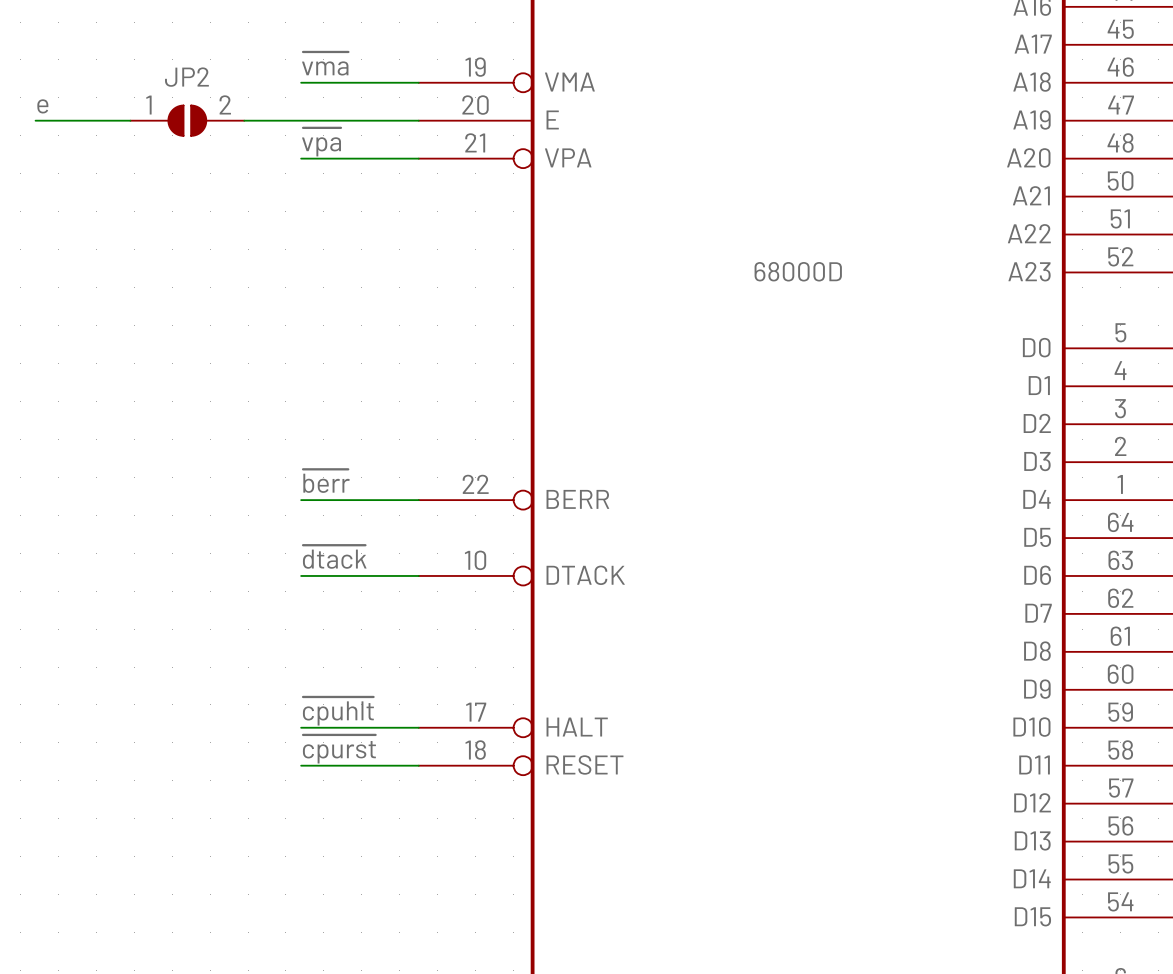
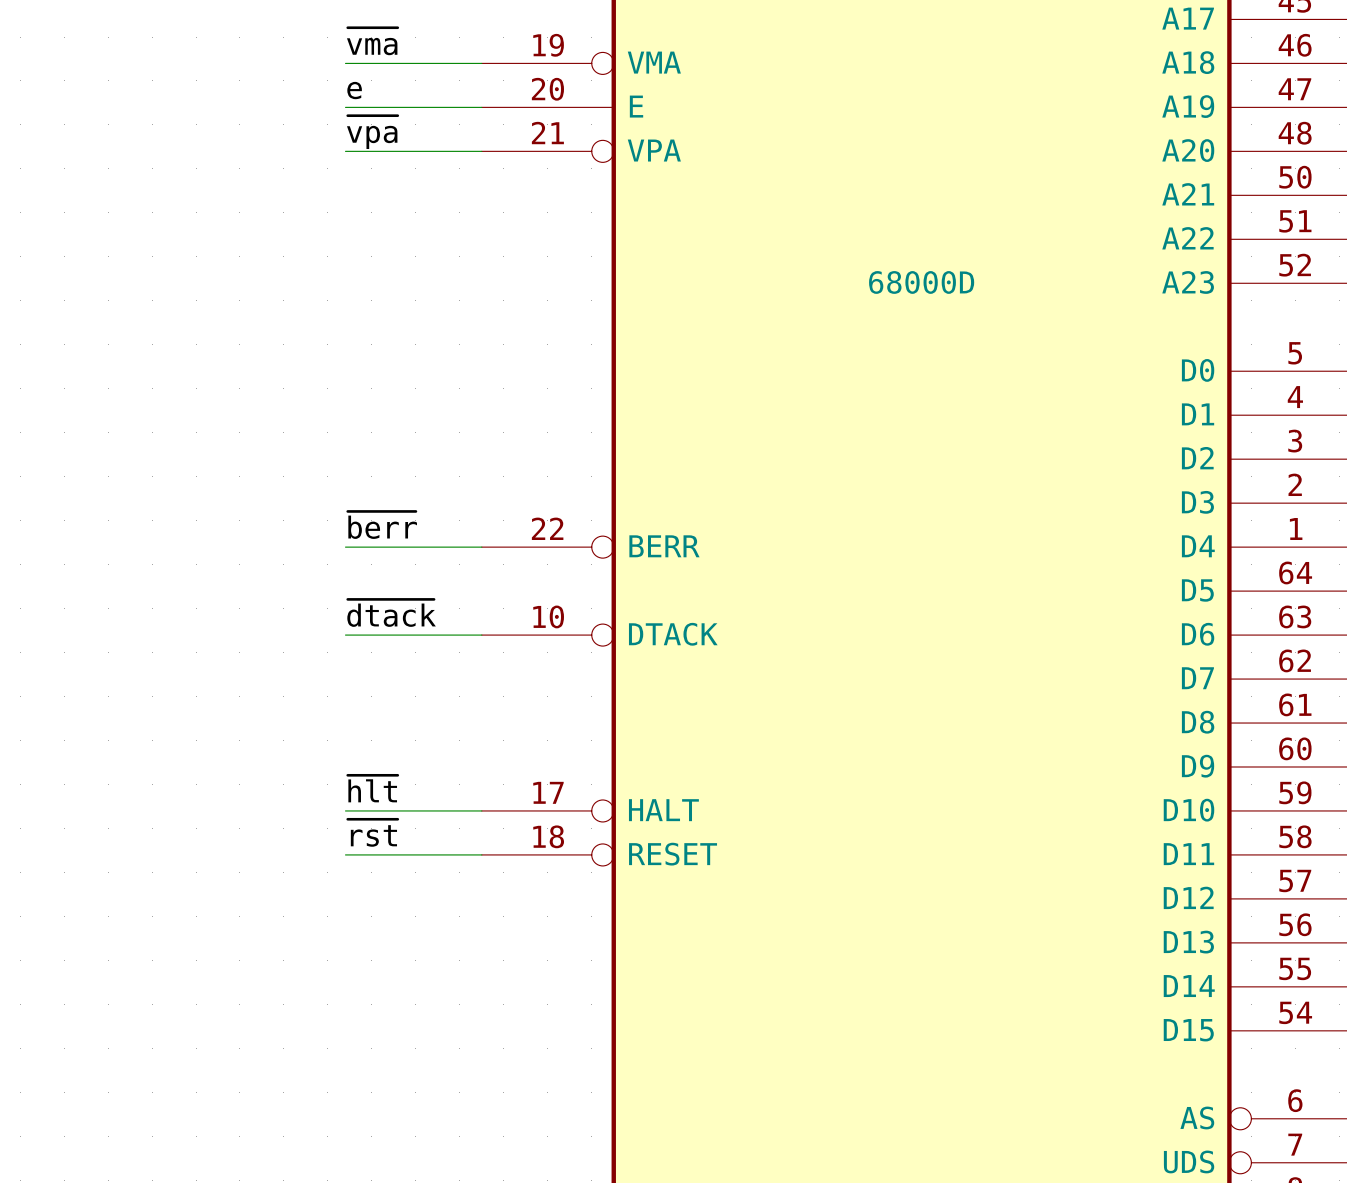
label position: e (42, 106) -> e (354, 90)
wire: (35, 120) (130, 120) -> none
JP2: (187, 120) -> none
wire: (244, 120) (301, 120) -> none
label: ~{cpuhlt} (338, 711) -> ~{hlt} (372, 788)
label: ~{cpurst} (339, 749) -> ~{rst} (372, 833)

